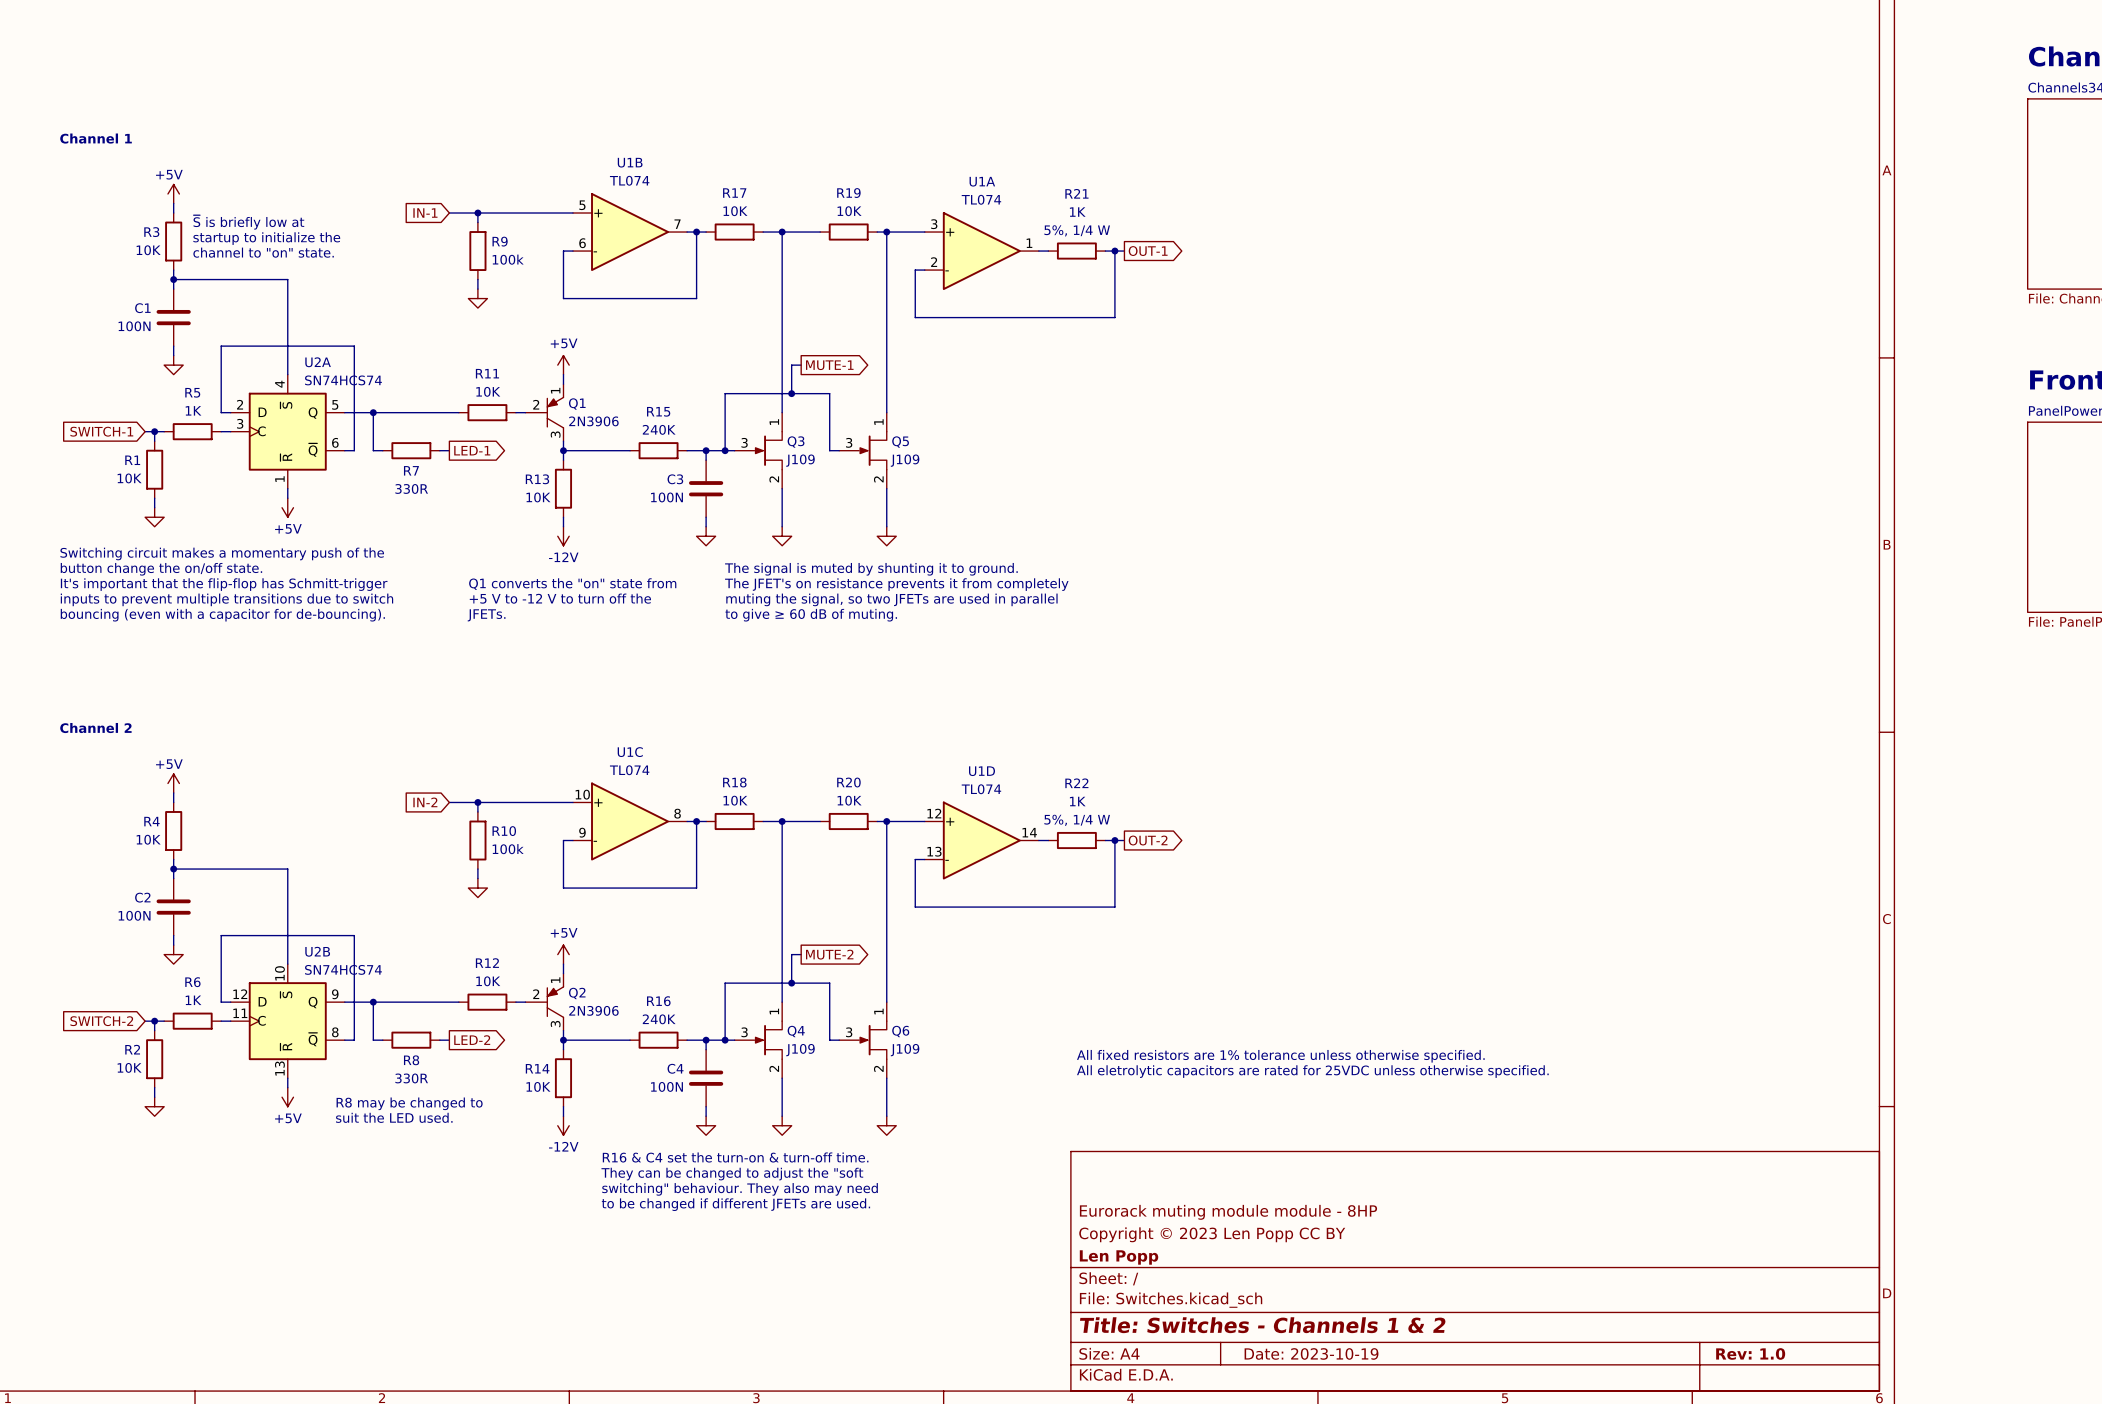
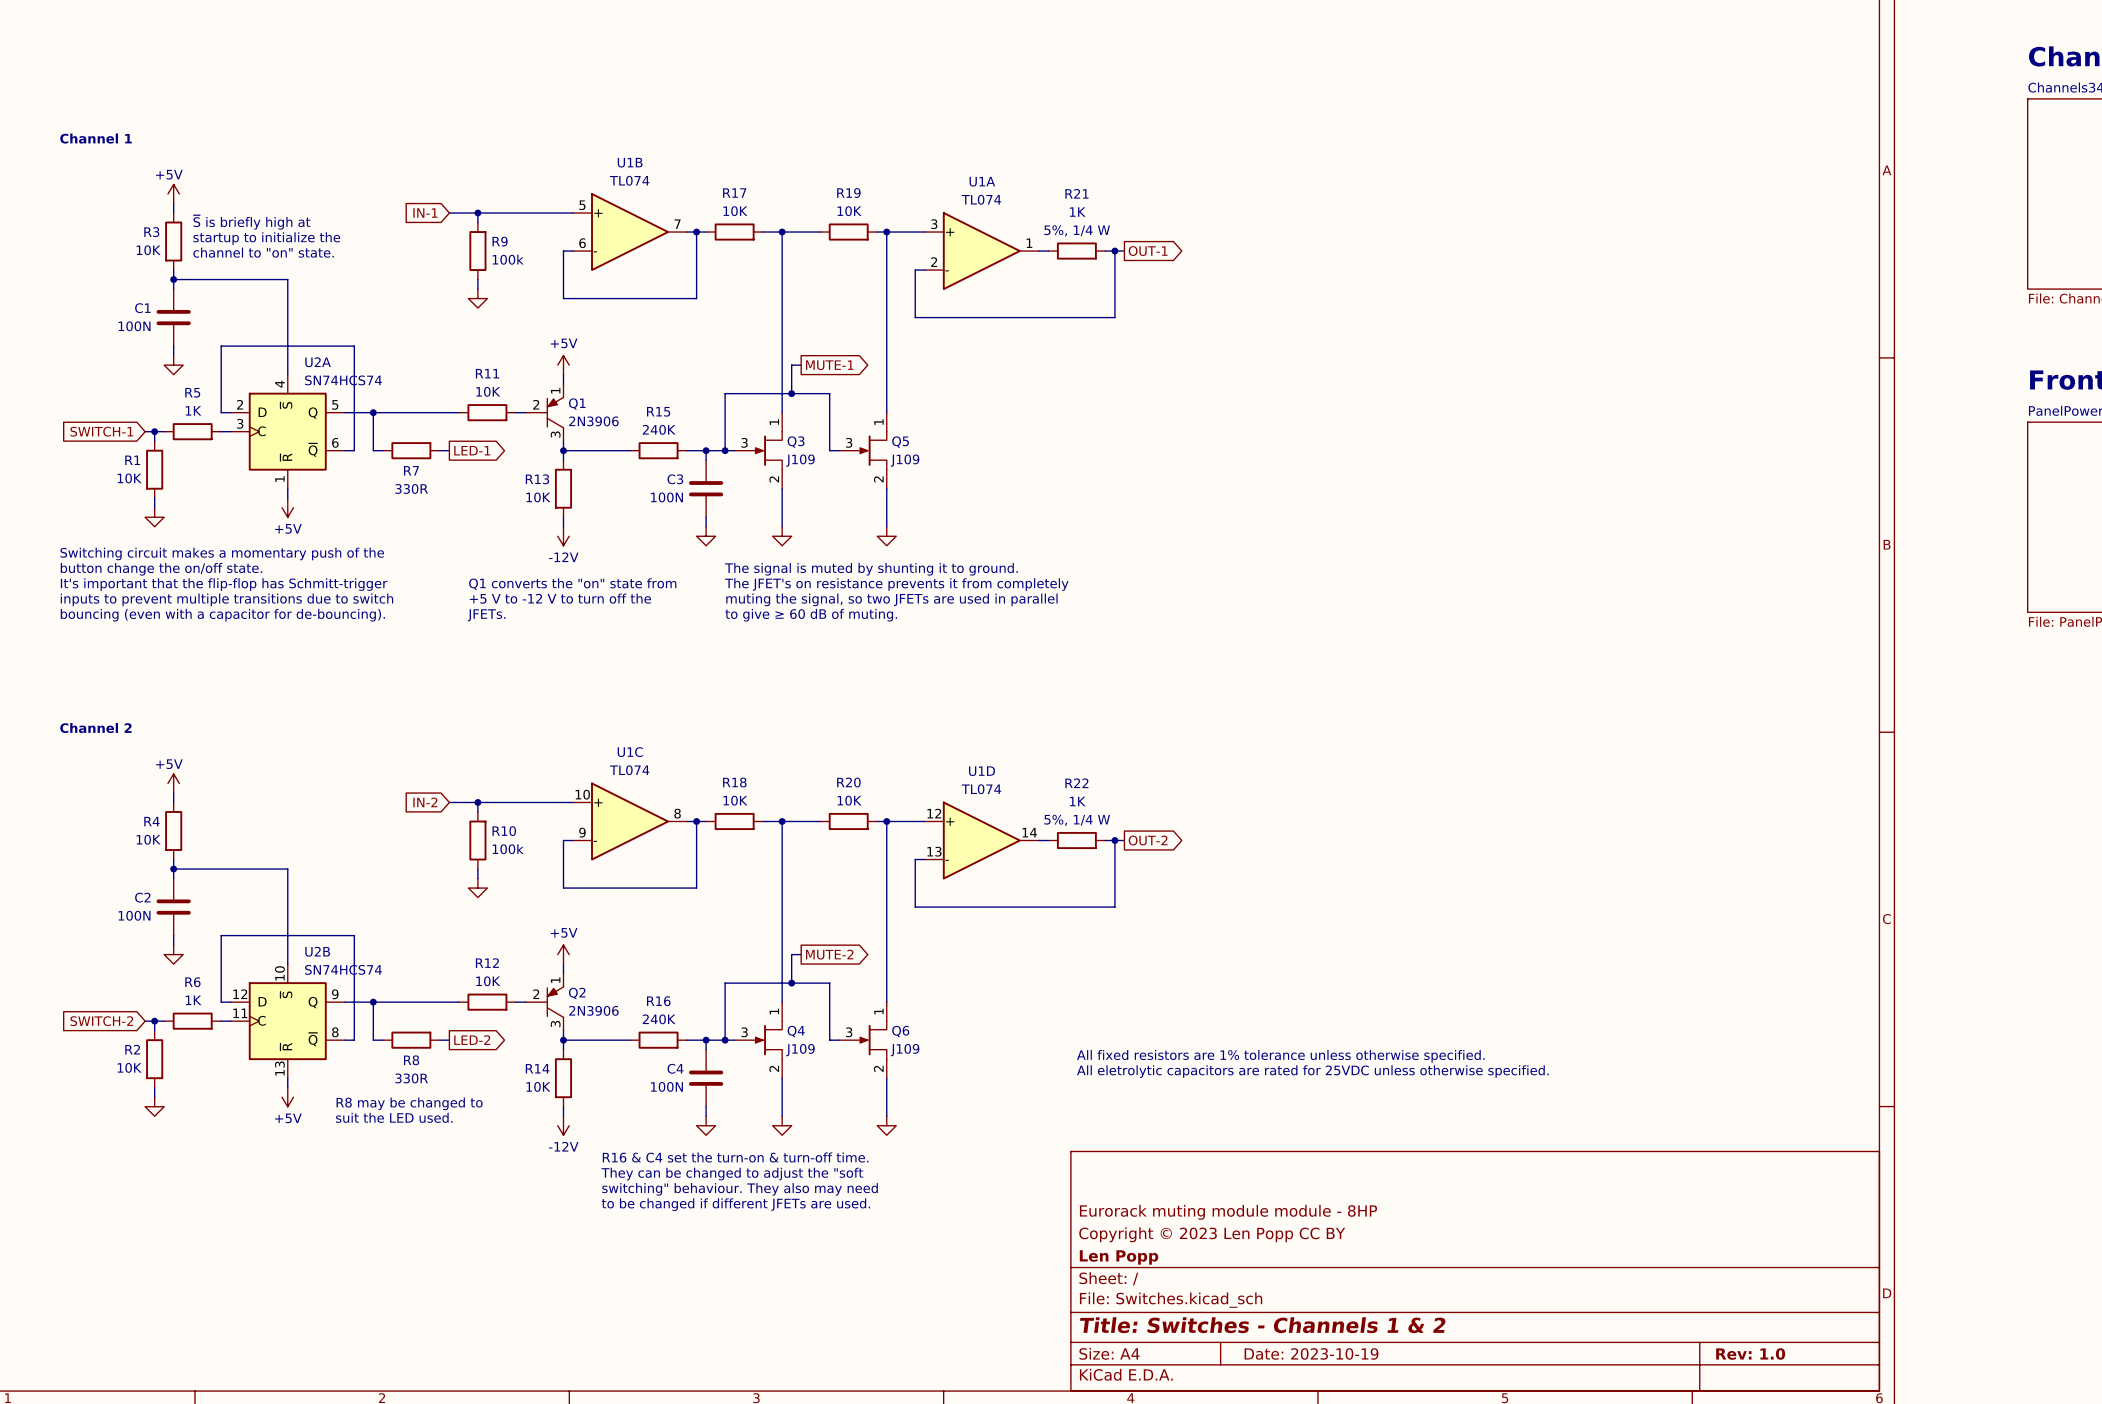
text: ~{S} is briefly low at (248, 222) -> ~{S} is briefly high at (251, 222)

